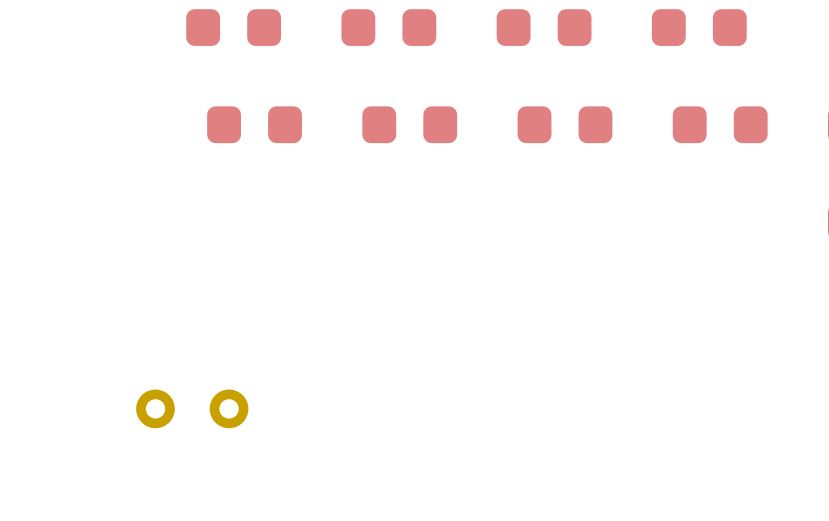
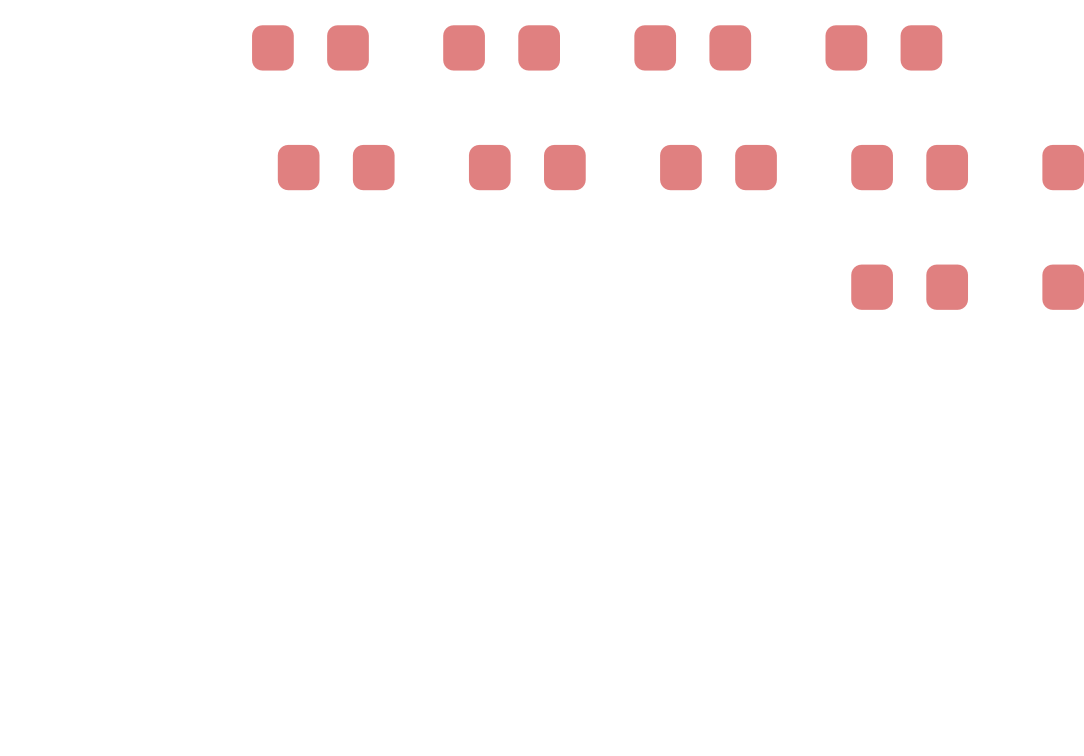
part: none -> (909, 287)
part: (192, 408) -> none

